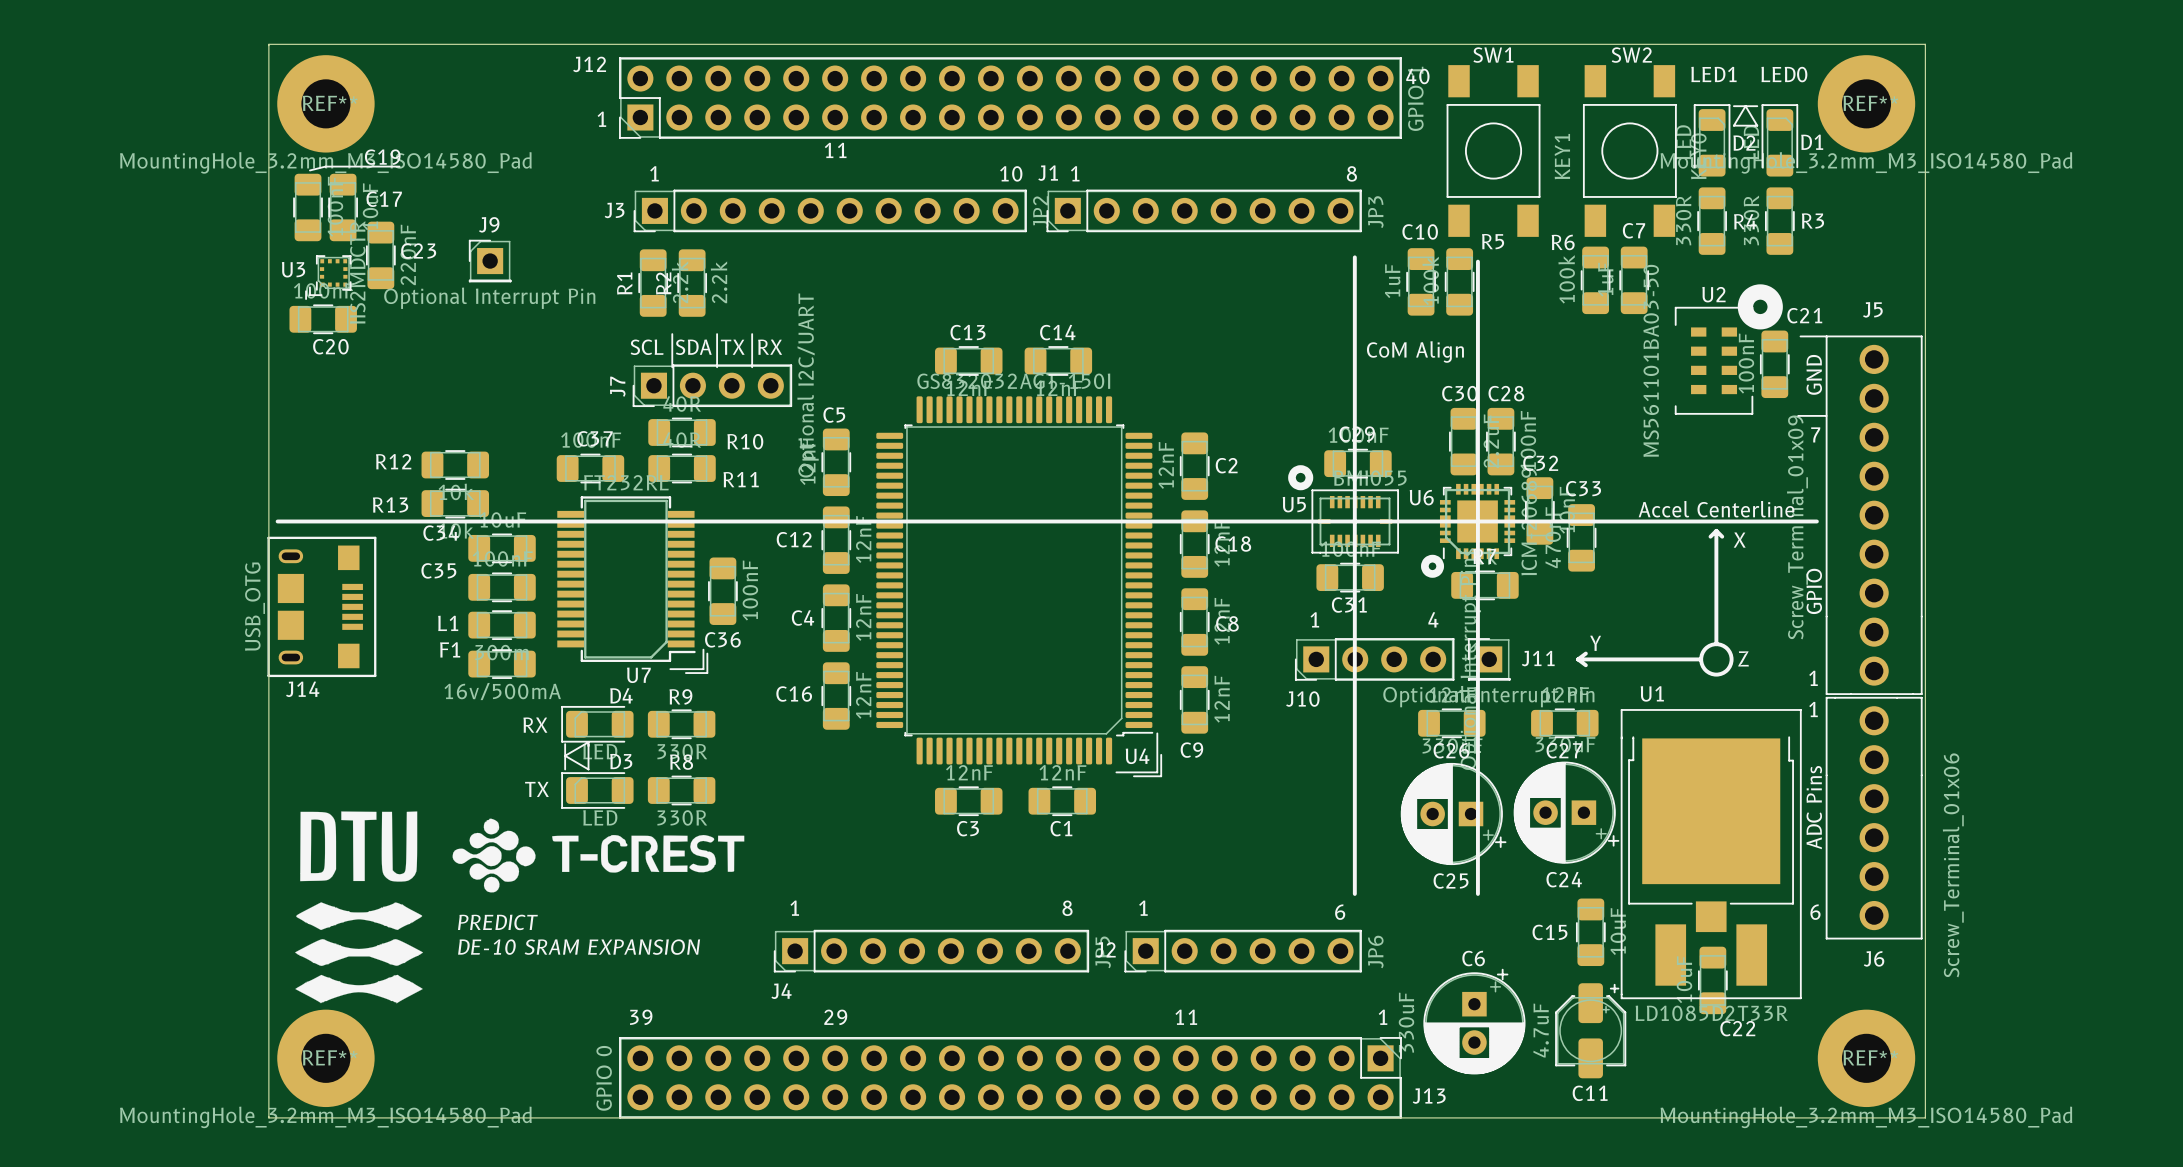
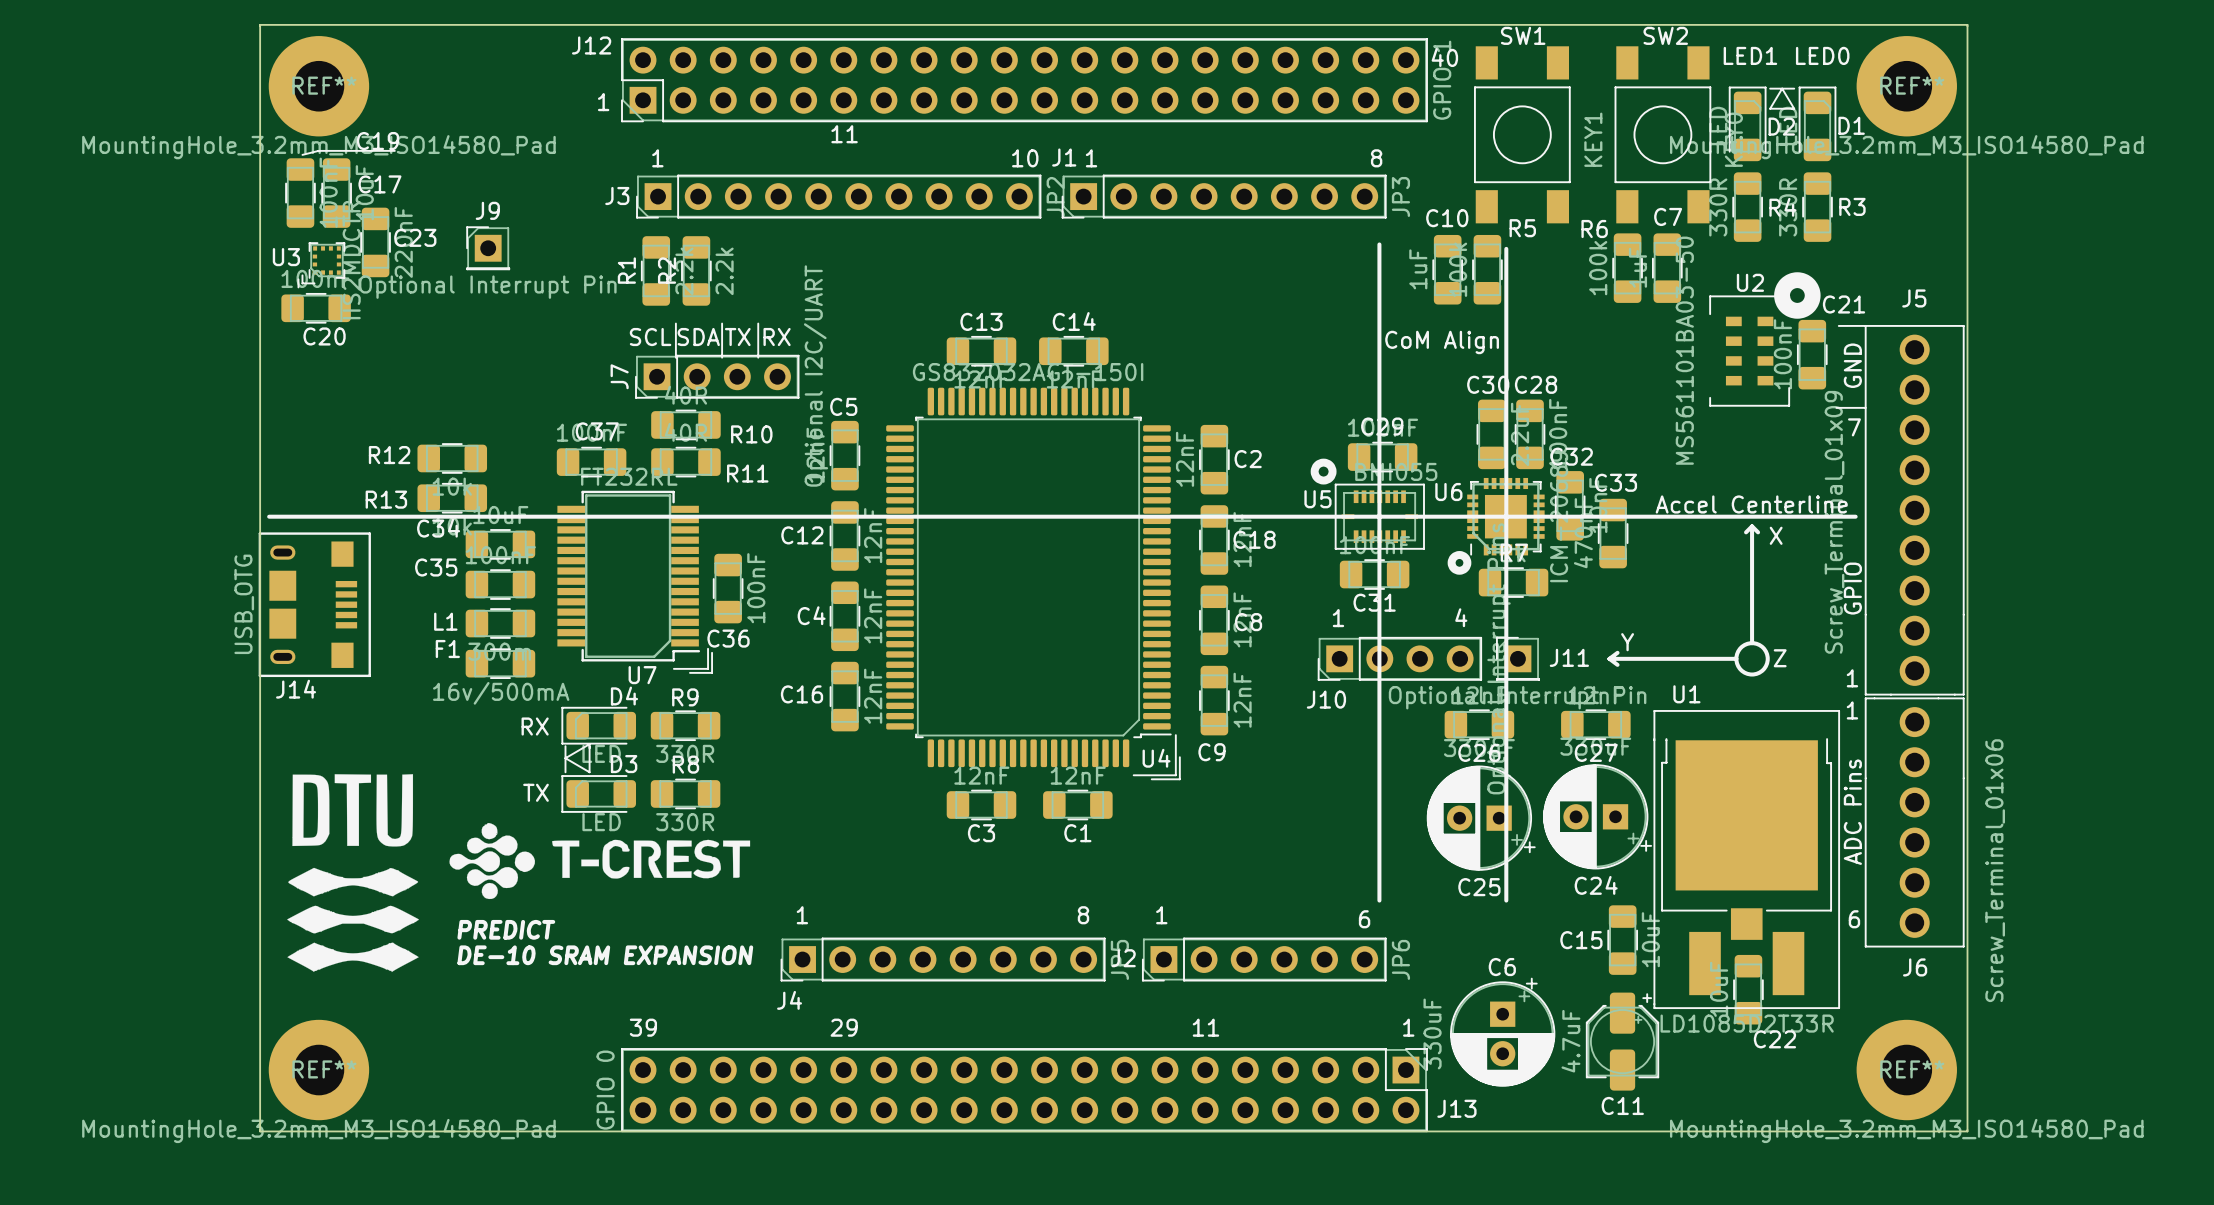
drawing position: (359, 907) -> (353, 873)

